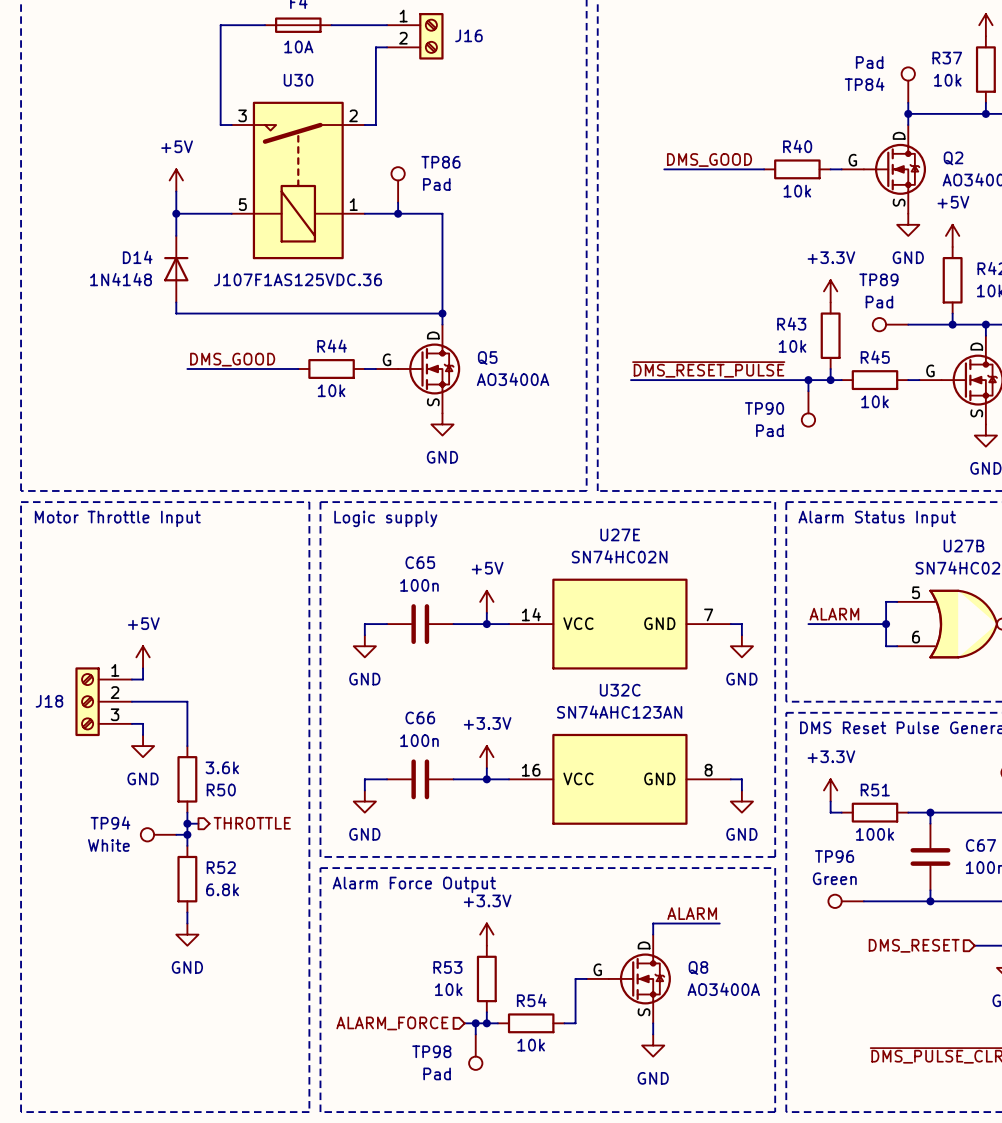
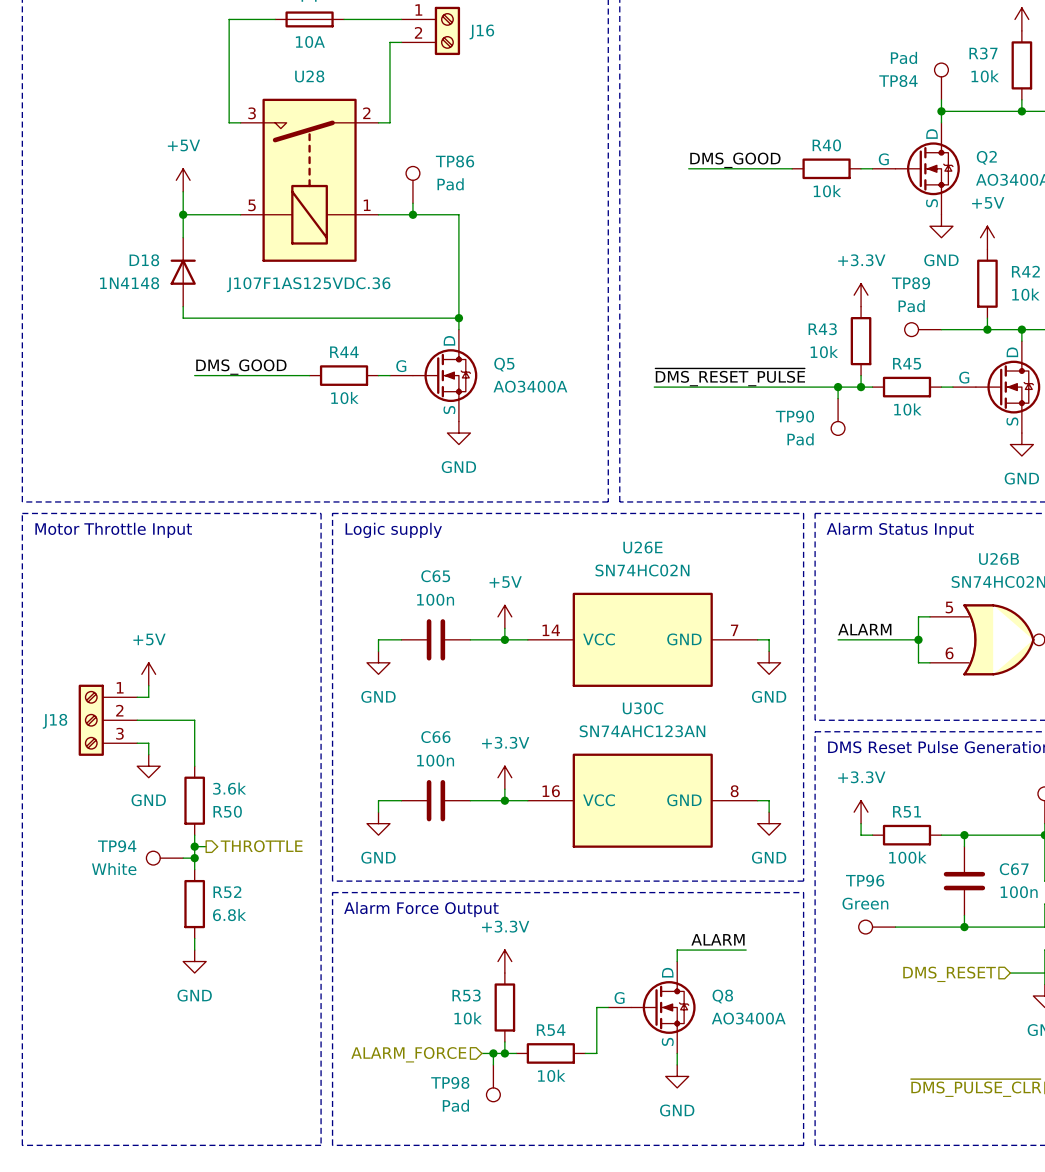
U30 name: U30 (298, 80) -> U28 (309, 76)
D14 name: D14 (137, 257) -> D18 (144, 260)
U27E name: U27E (620, 534) -> U26E (642, 547)
U27B name: U27B (963, 546) -> U26B (999, 559)
U32C name: U32C (620, 690) -> U30C (643, 708)

